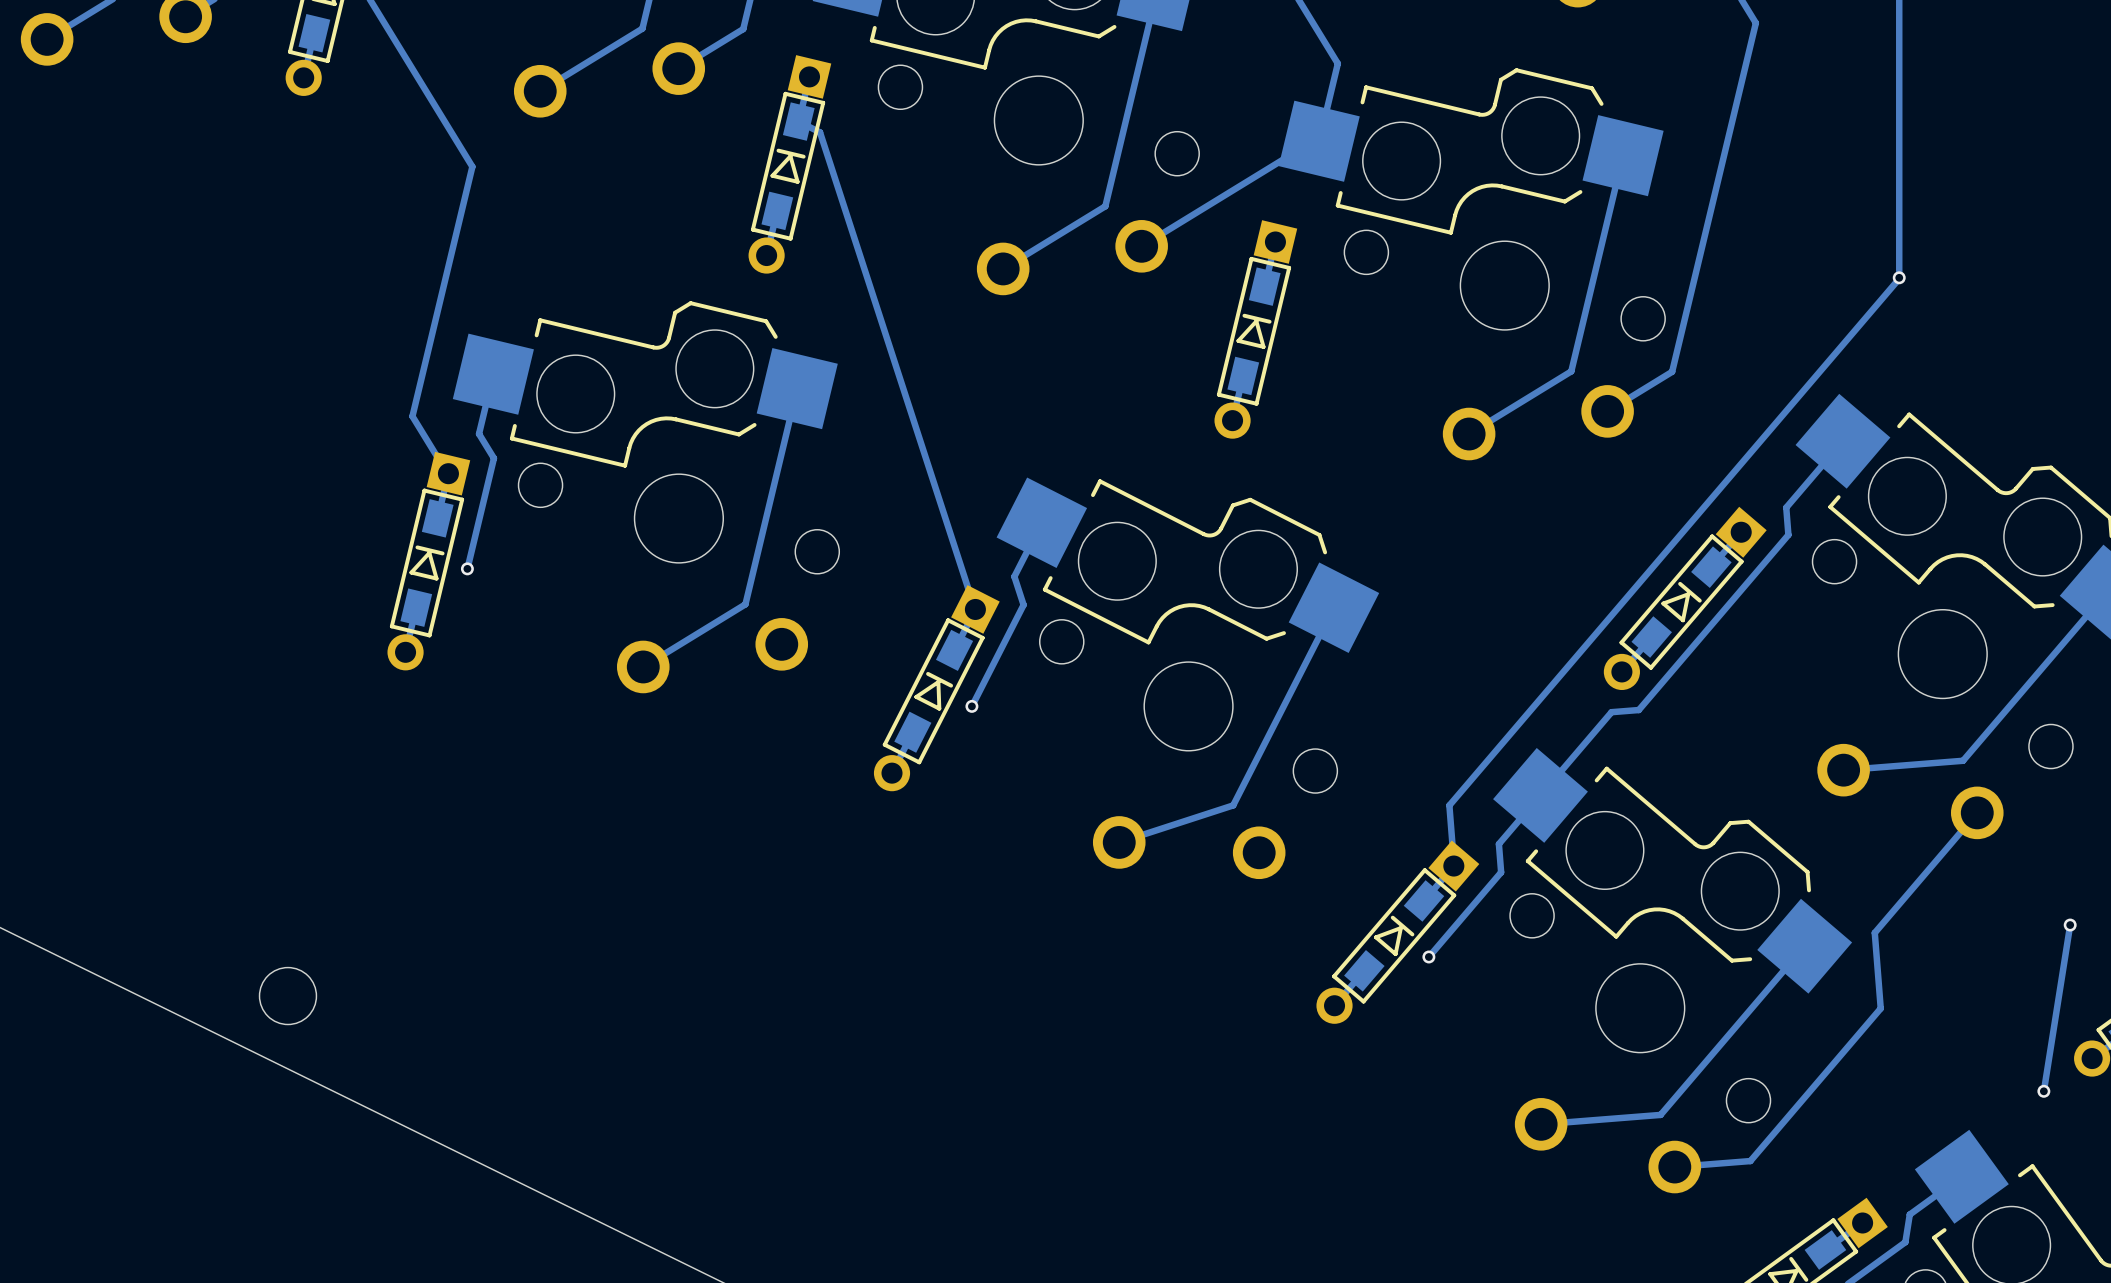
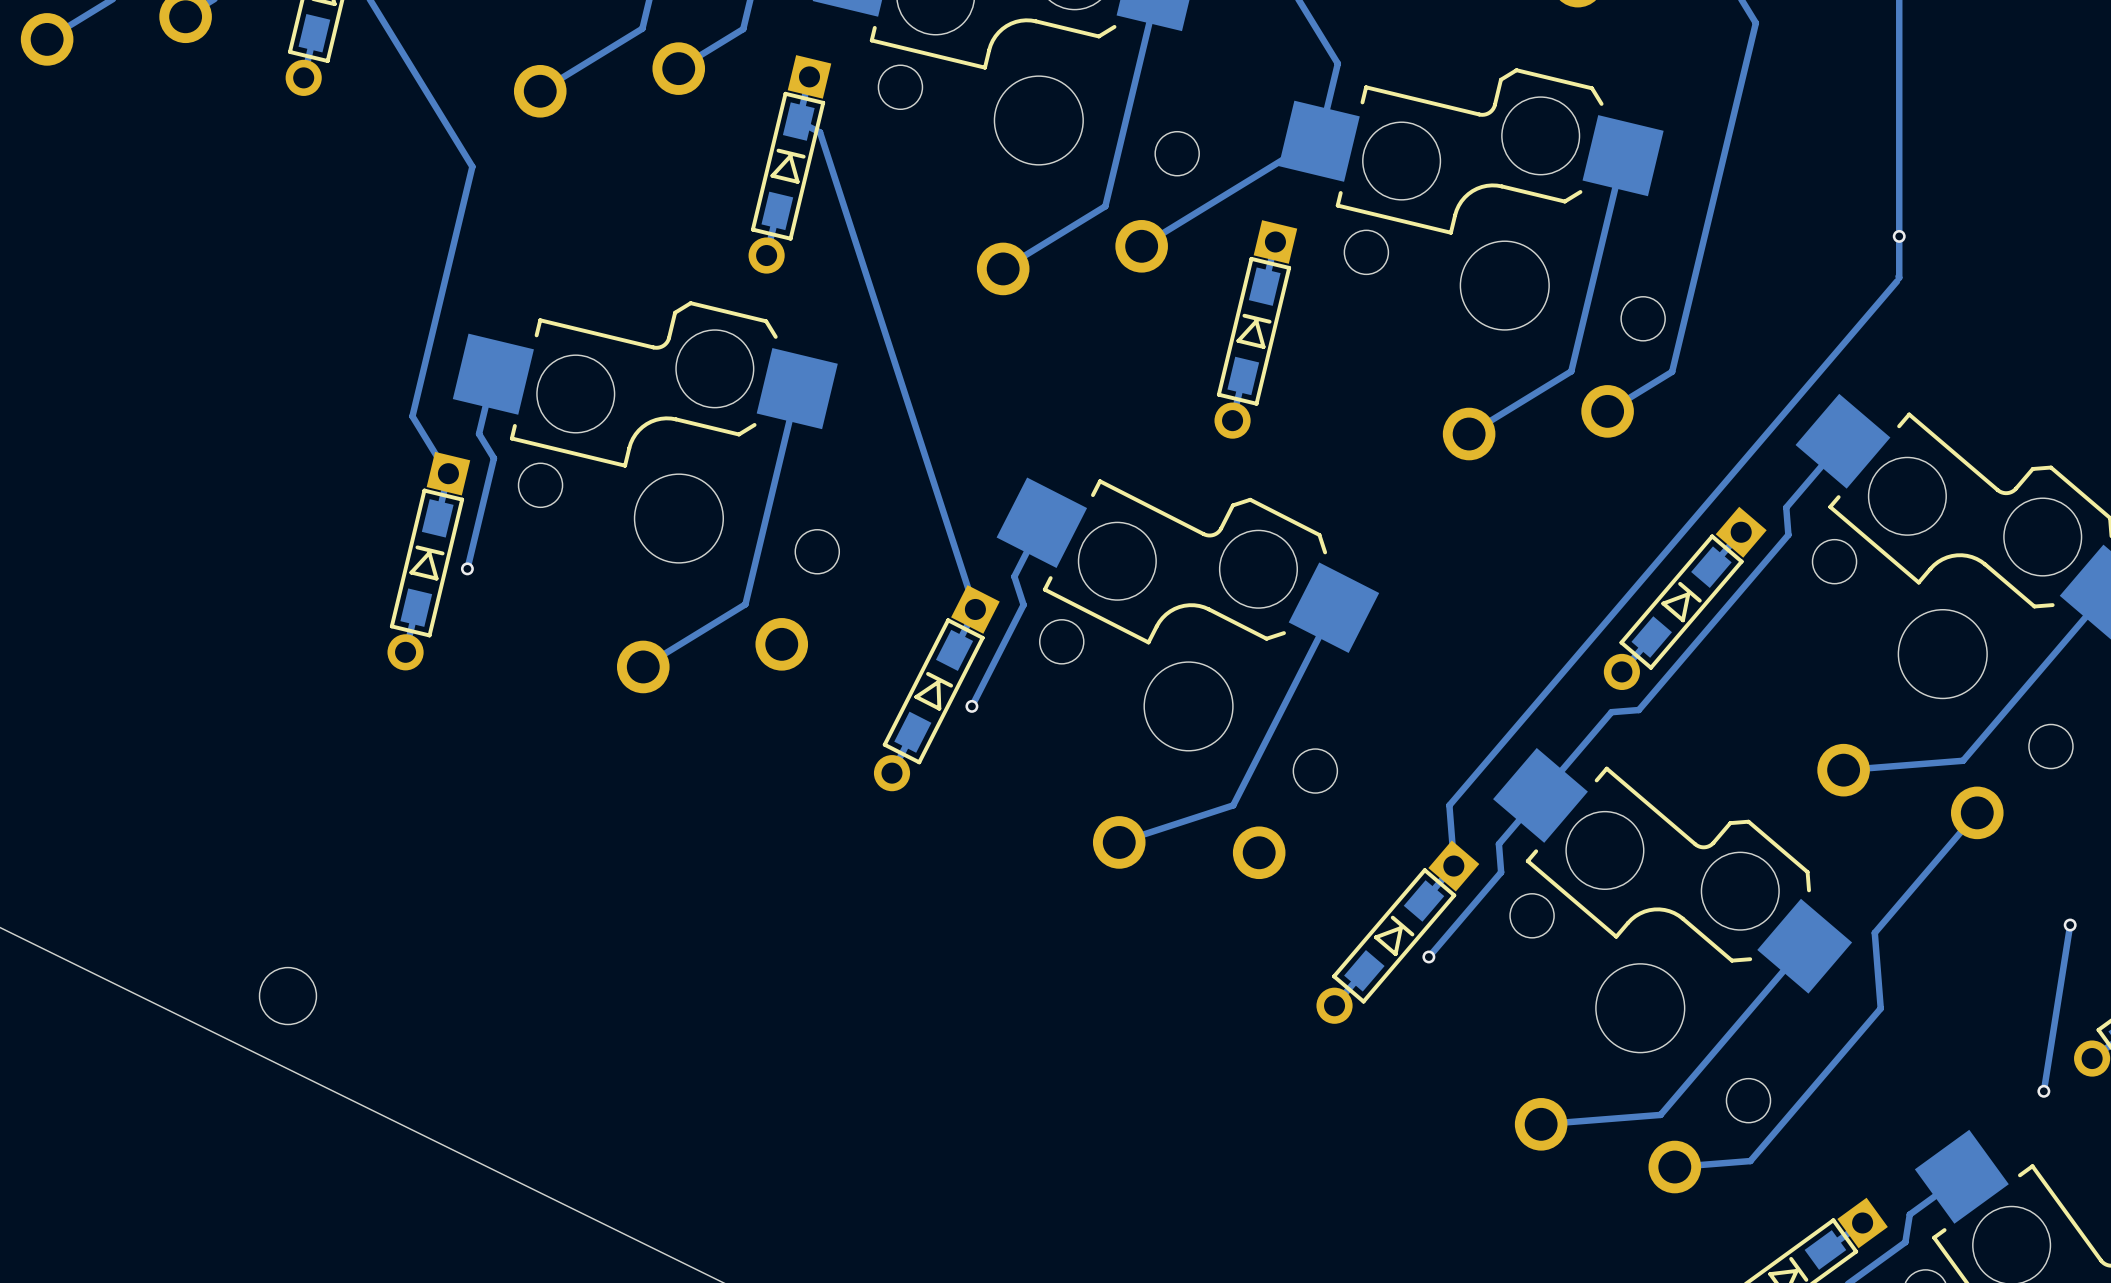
via position: (1899, 277) -> (1899, 236)

